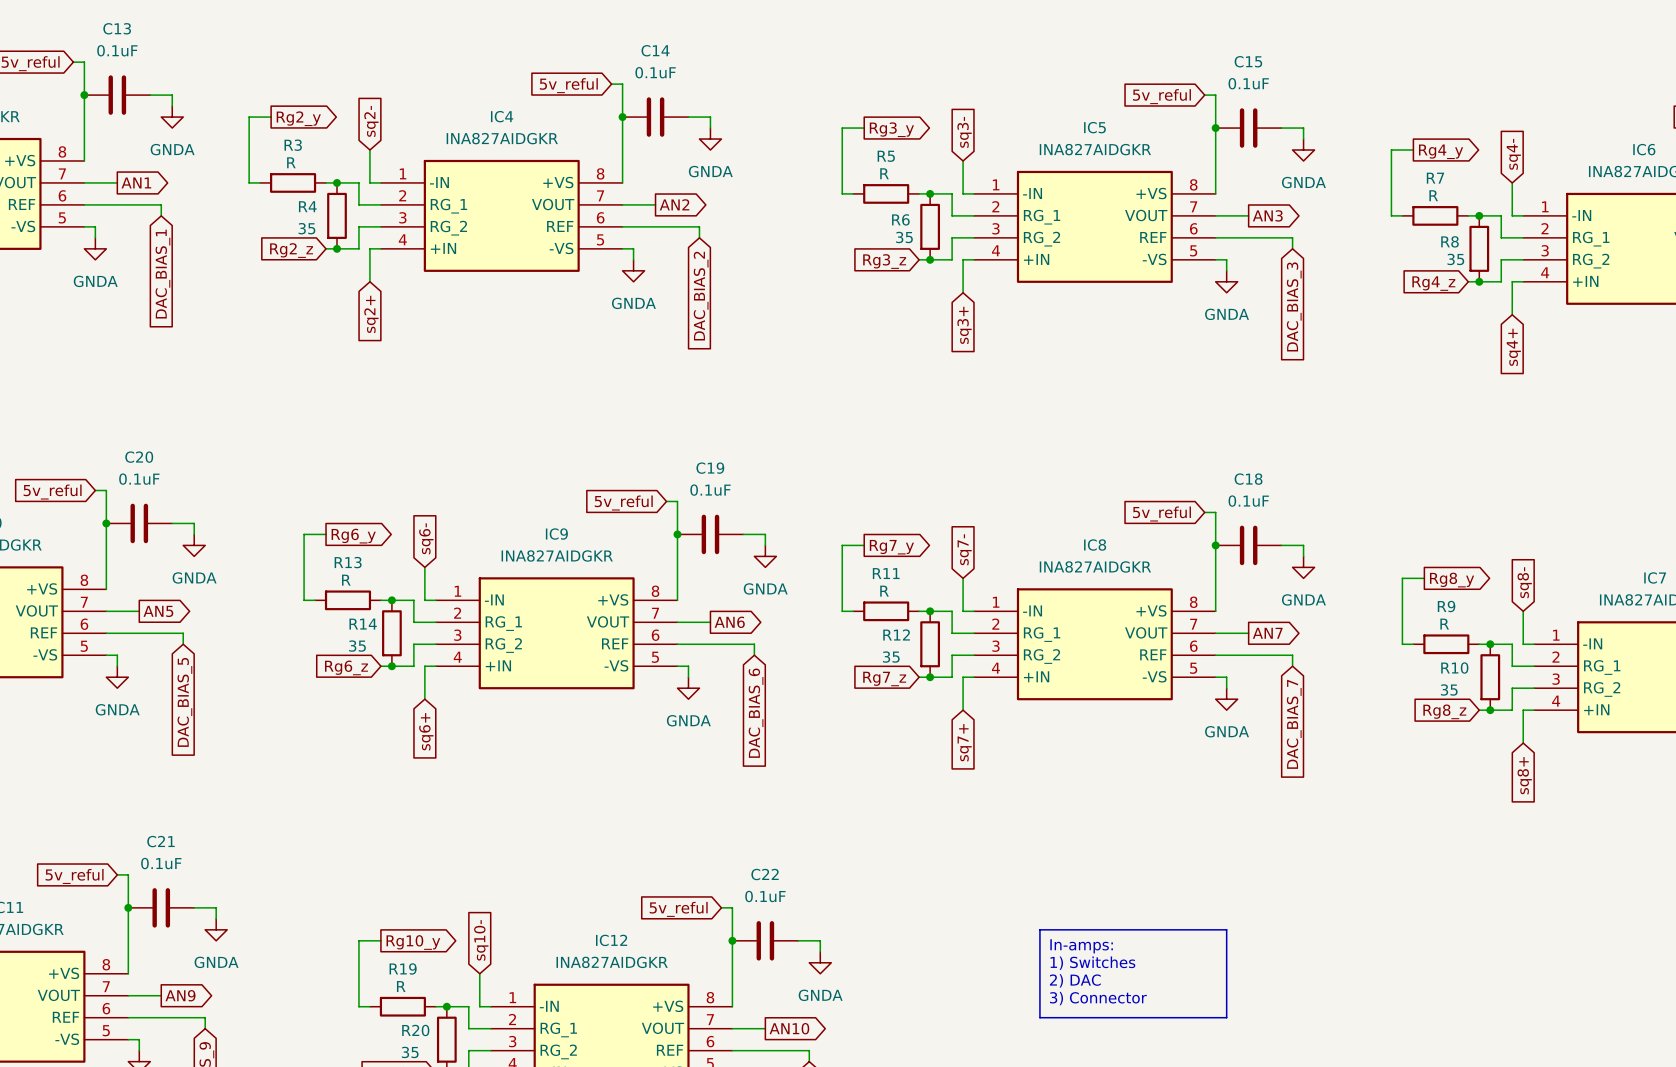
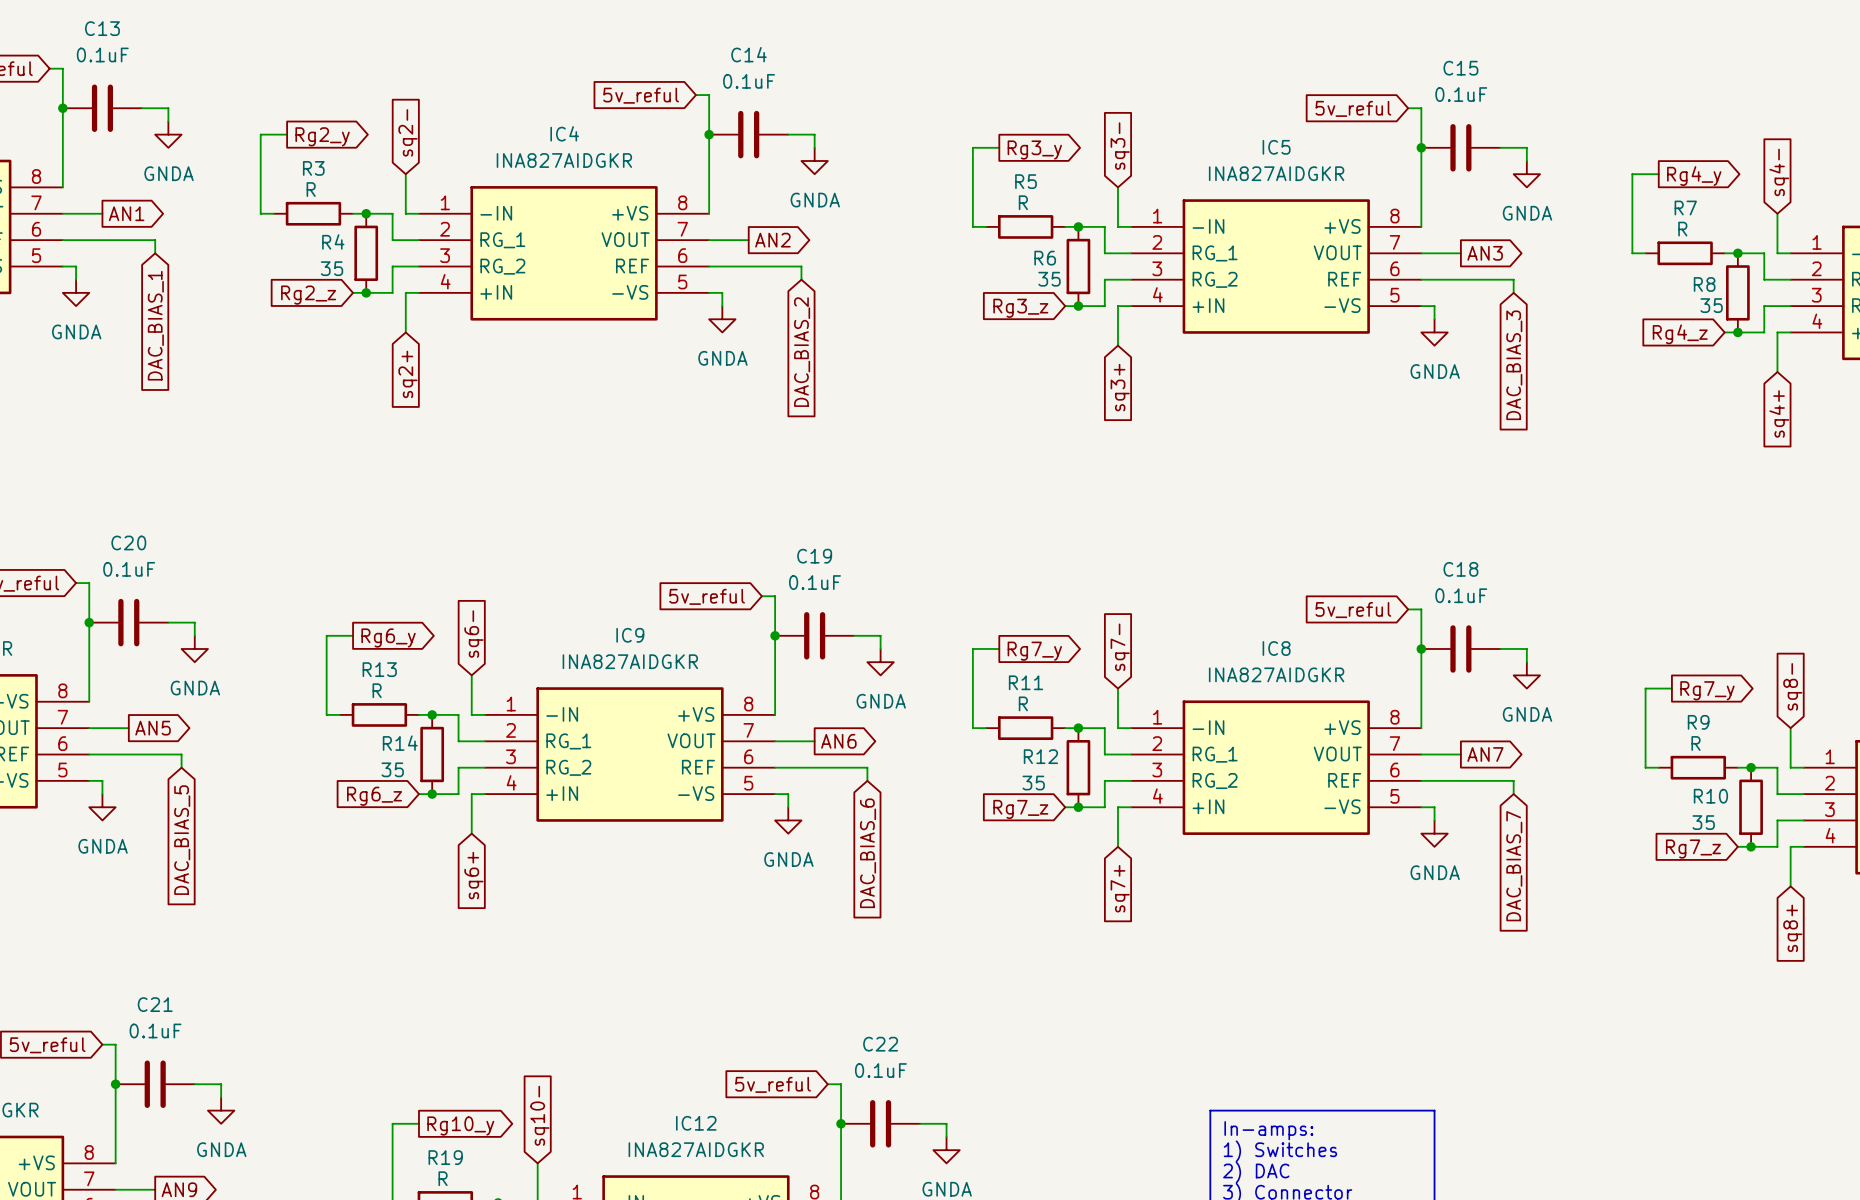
global label: Rg8_y (1452, 580) -> Rg7_y (1707, 690)
global label: Rg8_z (1444, 711) -> Rg7_z (1693, 849)

